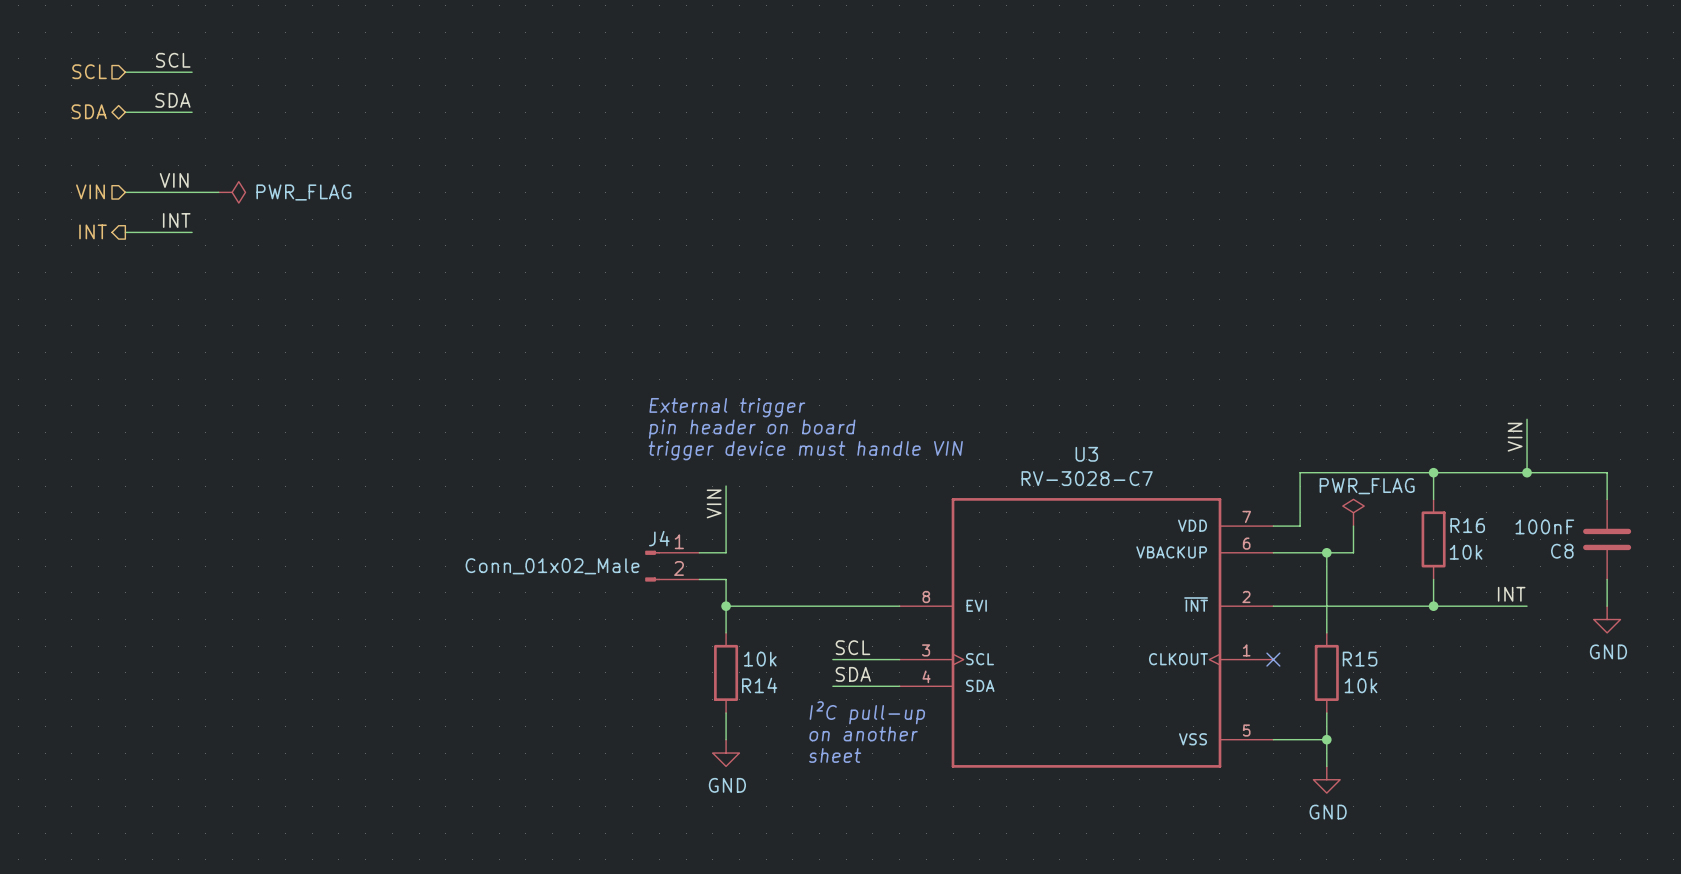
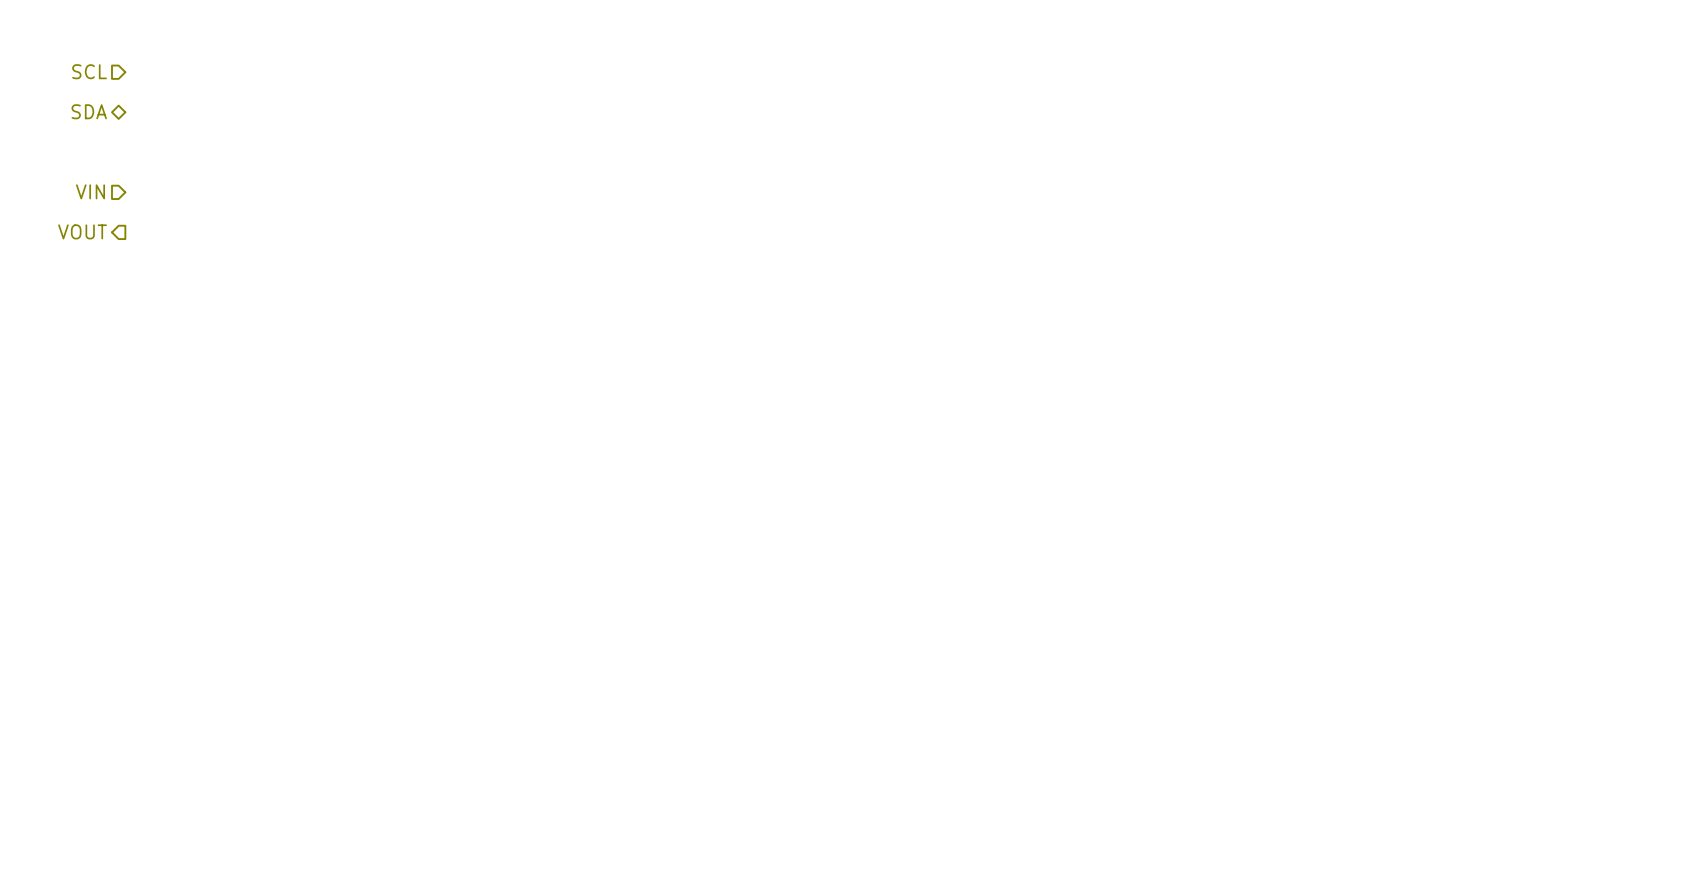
label: SCL (173, 60) -> none
wire: (125, 72) (192, 72) -> none
label: SDA (172, 100) -> none
wire: (125, 112) (192, 112) -> none
label: VIN (174, 180) -> none
wire: (125, 192) (218, 192) -> none
power symbol: PWR_FLAG (232, 192) -> none
label: INT (176, 220) -> none
hierarchical label: INT (93, 231) -> VOUT (82, 231)
wire: (125, 232) (192, 232) -> none
text: External trigger (727, 407) -> none
wire: (1527, 419) (1527, 472) -> none
text: pin header on board (752, 429) -> none
label: VIN (1515, 437) -> none
text: trigger device must handle VIN (805, 450) -> none
wire: (1433, 472) (1433, 499) -> none
junction: (1433, 472) -> none
junction: (1527, 472) -> none
wire: (726, 486) (726, 552) (699, 552) -> none
wire: (1607, 499) (1607, 472) (1300, 472) (1300, 526) (1273, 526) -> none
label: VIN (714, 503) -> none
power symbol: PWR_FLAG (1353, 512) -> none
wire: (1353, 526) (1353, 552) (1273, 552) -> none
R16: 10k (1433, 539) -> none
C8: 100nF (1607, 539) -> none
wire: (1326, 552) (1326, 632) -> none
junction: (1326, 552) -> none
J4: Conn_01x02_Male (672, 566) -> none
wire: (699, 579) (726, 579) (726, 632) -> none
wire: (1433, 579) (1433, 606) -> none
wire: (1607, 579) (1607, 606) -> none
label: INT (1511, 594) -> none
wire: (726, 606) (899, 606) -> none
junction: (726, 606) -> none
wire: (1273, 606) (1527, 606) -> none
junction: (1433, 606) -> none
power symbol: GND (1607, 619) -> none
U3: RV-3028-C7 (1086, 632) -> none
label: SCL (852, 647) -> none
wire: (832, 659) (899, 659) -> none
no-connect mark: (1273, 659) -> none
R14: 10k (726, 672) -> none
R15: 10k (1326, 672) -> none
label: SDA (853, 674) -> none
wire: (832, 686) (899, 686) -> none
wire: (726, 712) (726, 739) -> none
text: I²C pull-up (867, 712) -> none
wire: (1326, 712) (1326, 766) -> none
text: on another (863, 733) -> none
wire: (1273, 739) (1326, 739) -> none
junction: (1326, 739) -> none
power symbol: GND (726, 753) -> none
text: sheet (835, 755) -> none
power symbol: GND (1326, 779) -> none

